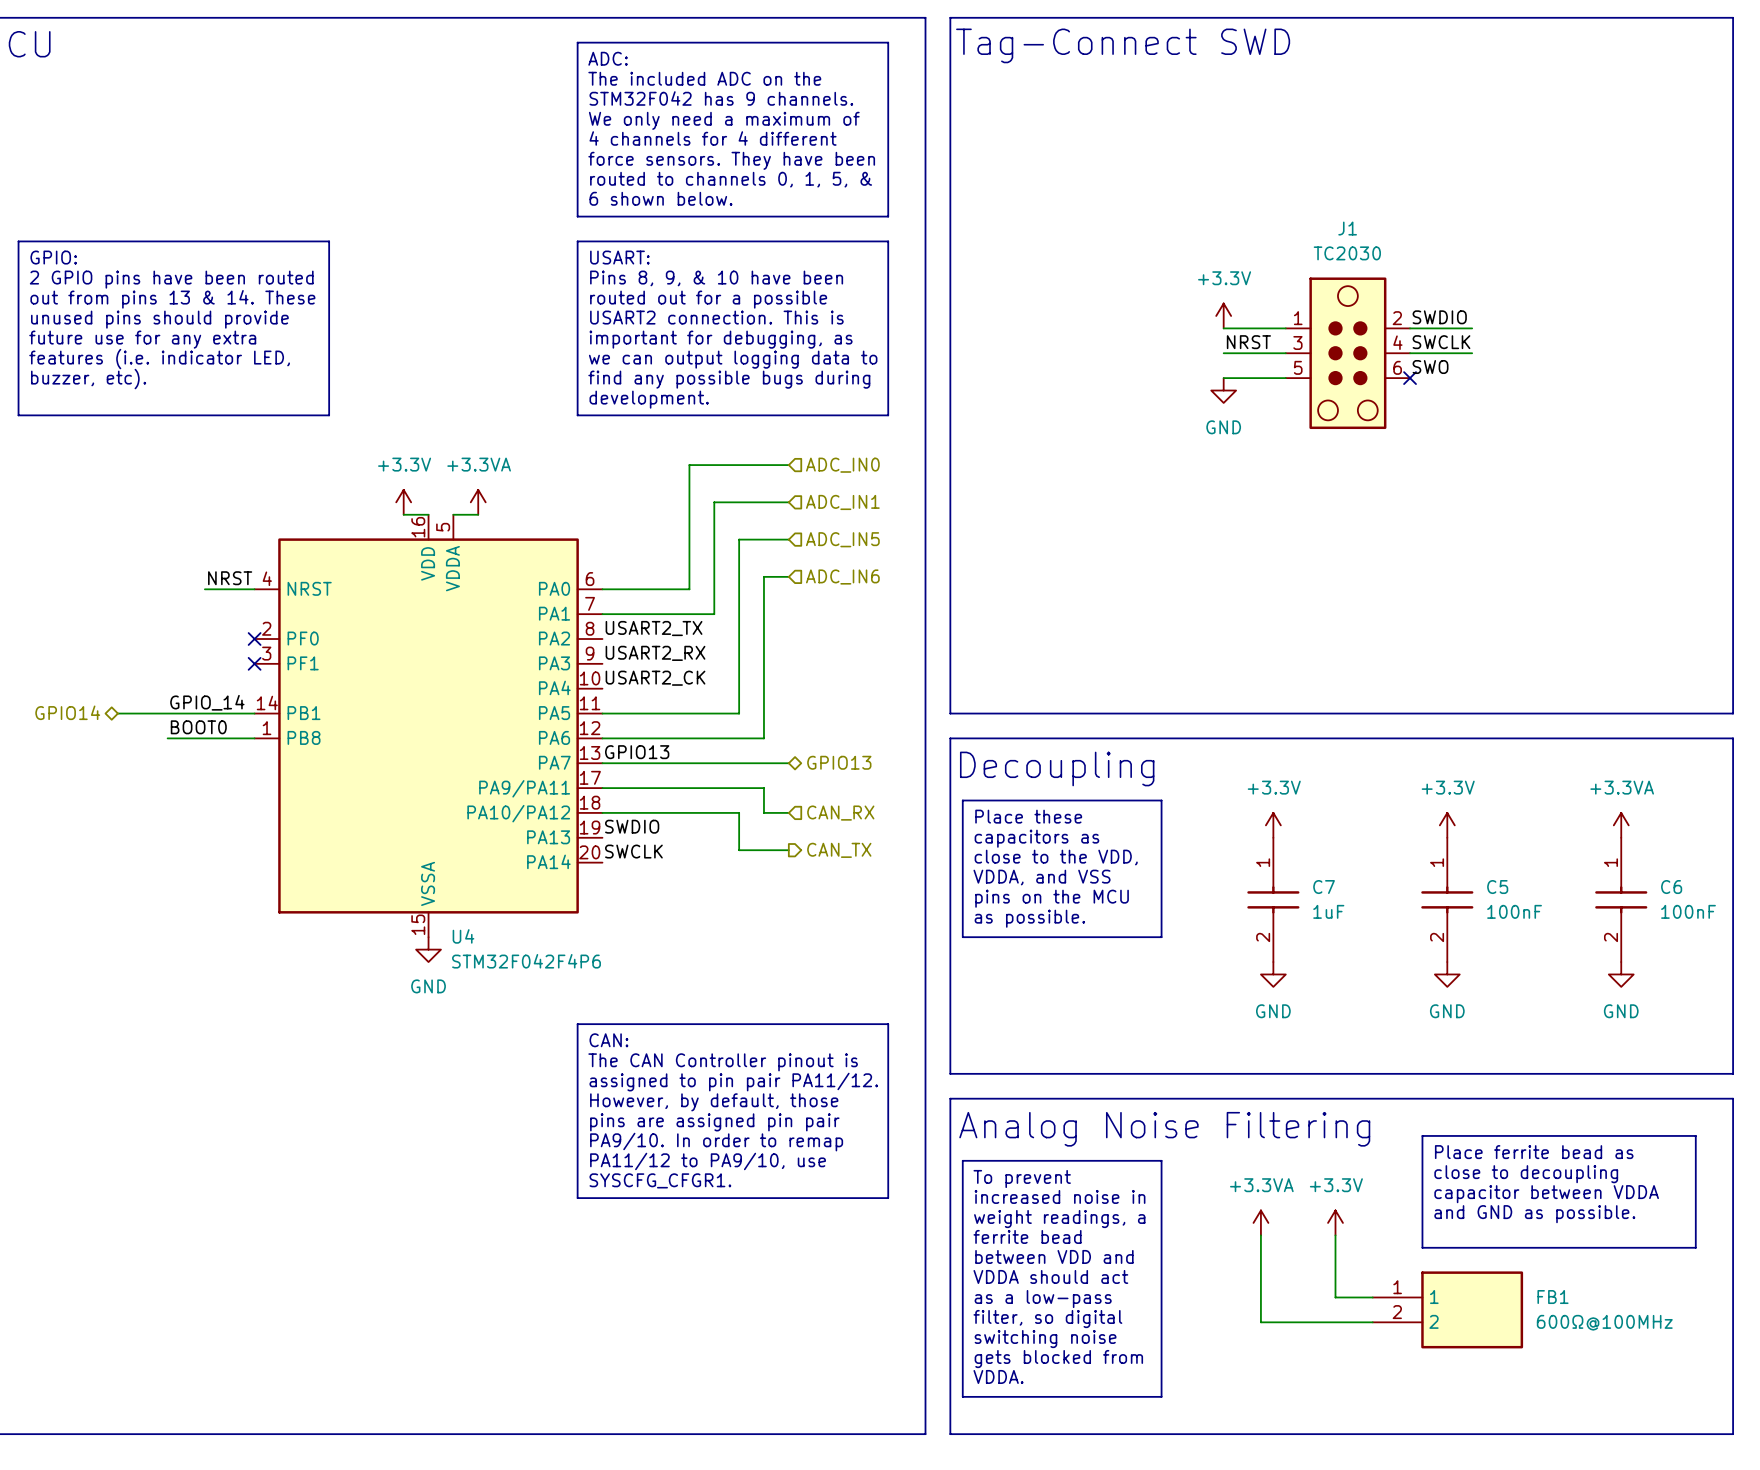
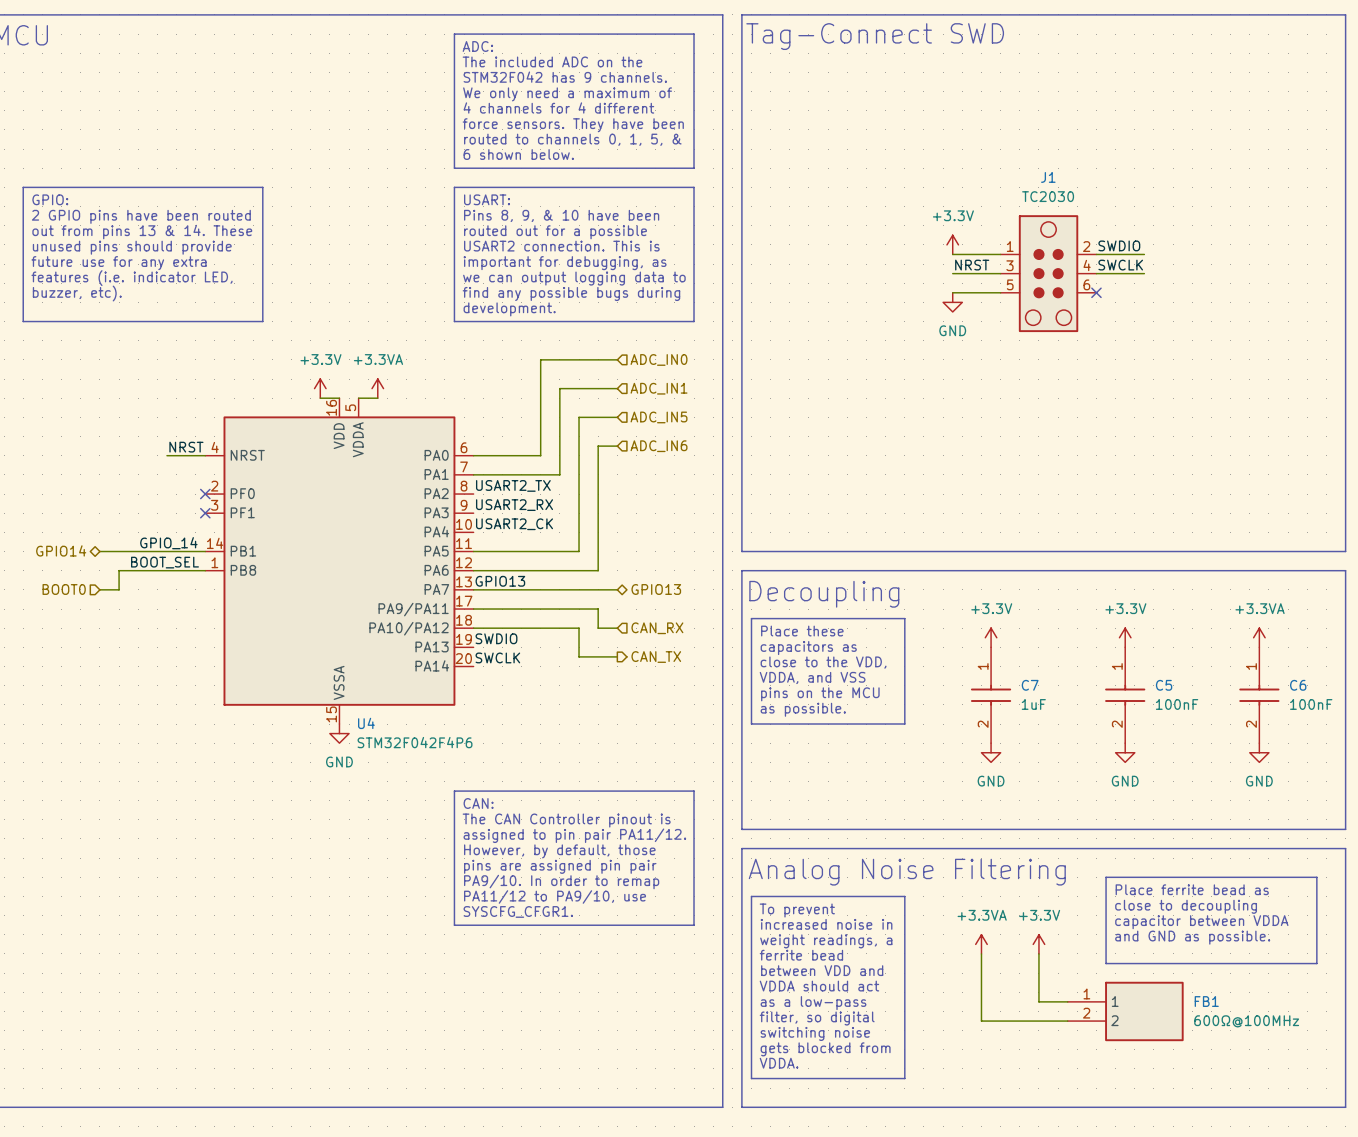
label: SWO (1430, 367) -> none
label: BOOT0 (198, 727) -> BOOT_SEL (164, 562)
wire: none -> (138, 570) (119, 570) (119, 589) (99, 589)
hierarchical label: none -> BOOT0 (64, 589)

